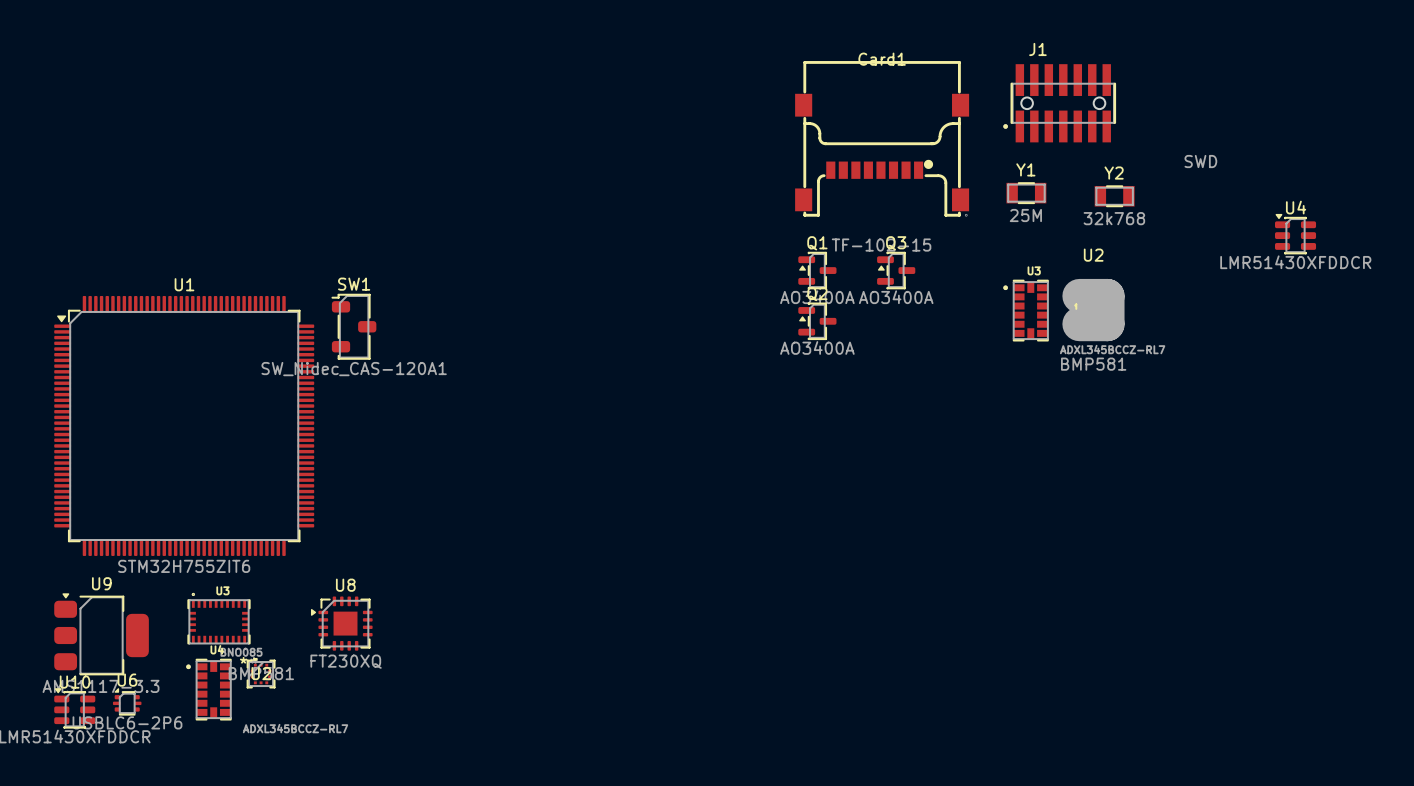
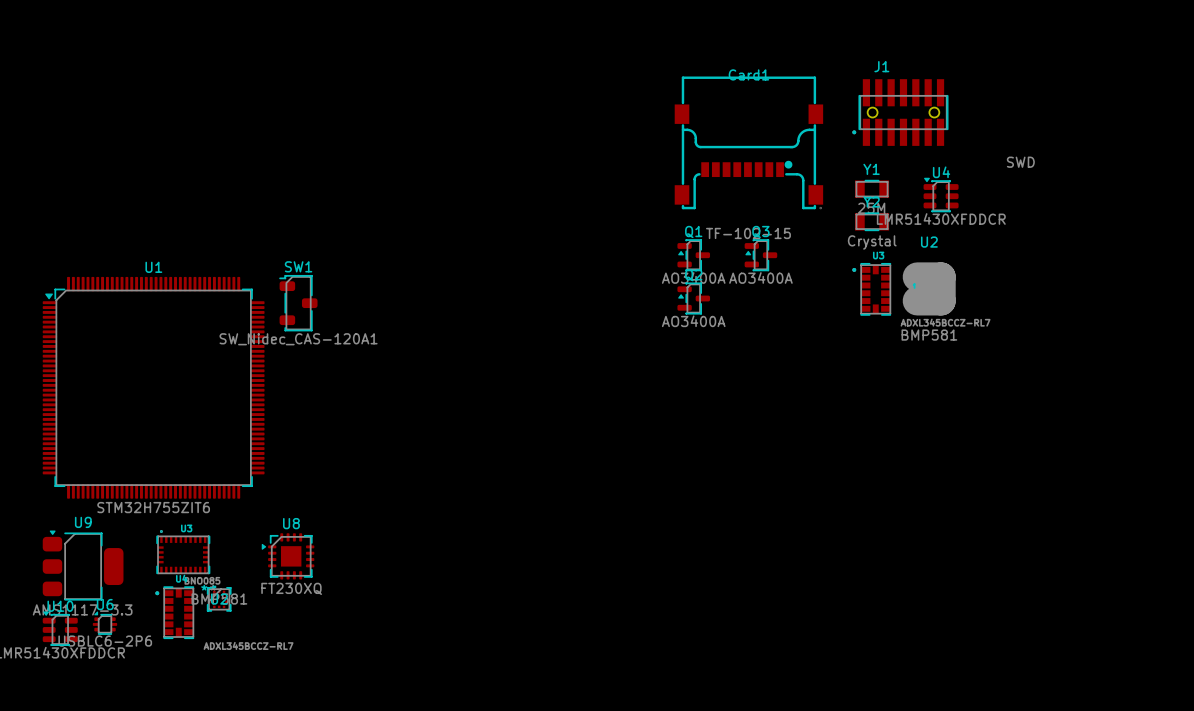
Y2 position: (1114, 196) -> (872, 221)
Y2 value: 32k768 (1114, 218) -> Crystal (872, 242)
U4 position: (1295, 234) -> (941, 194)

